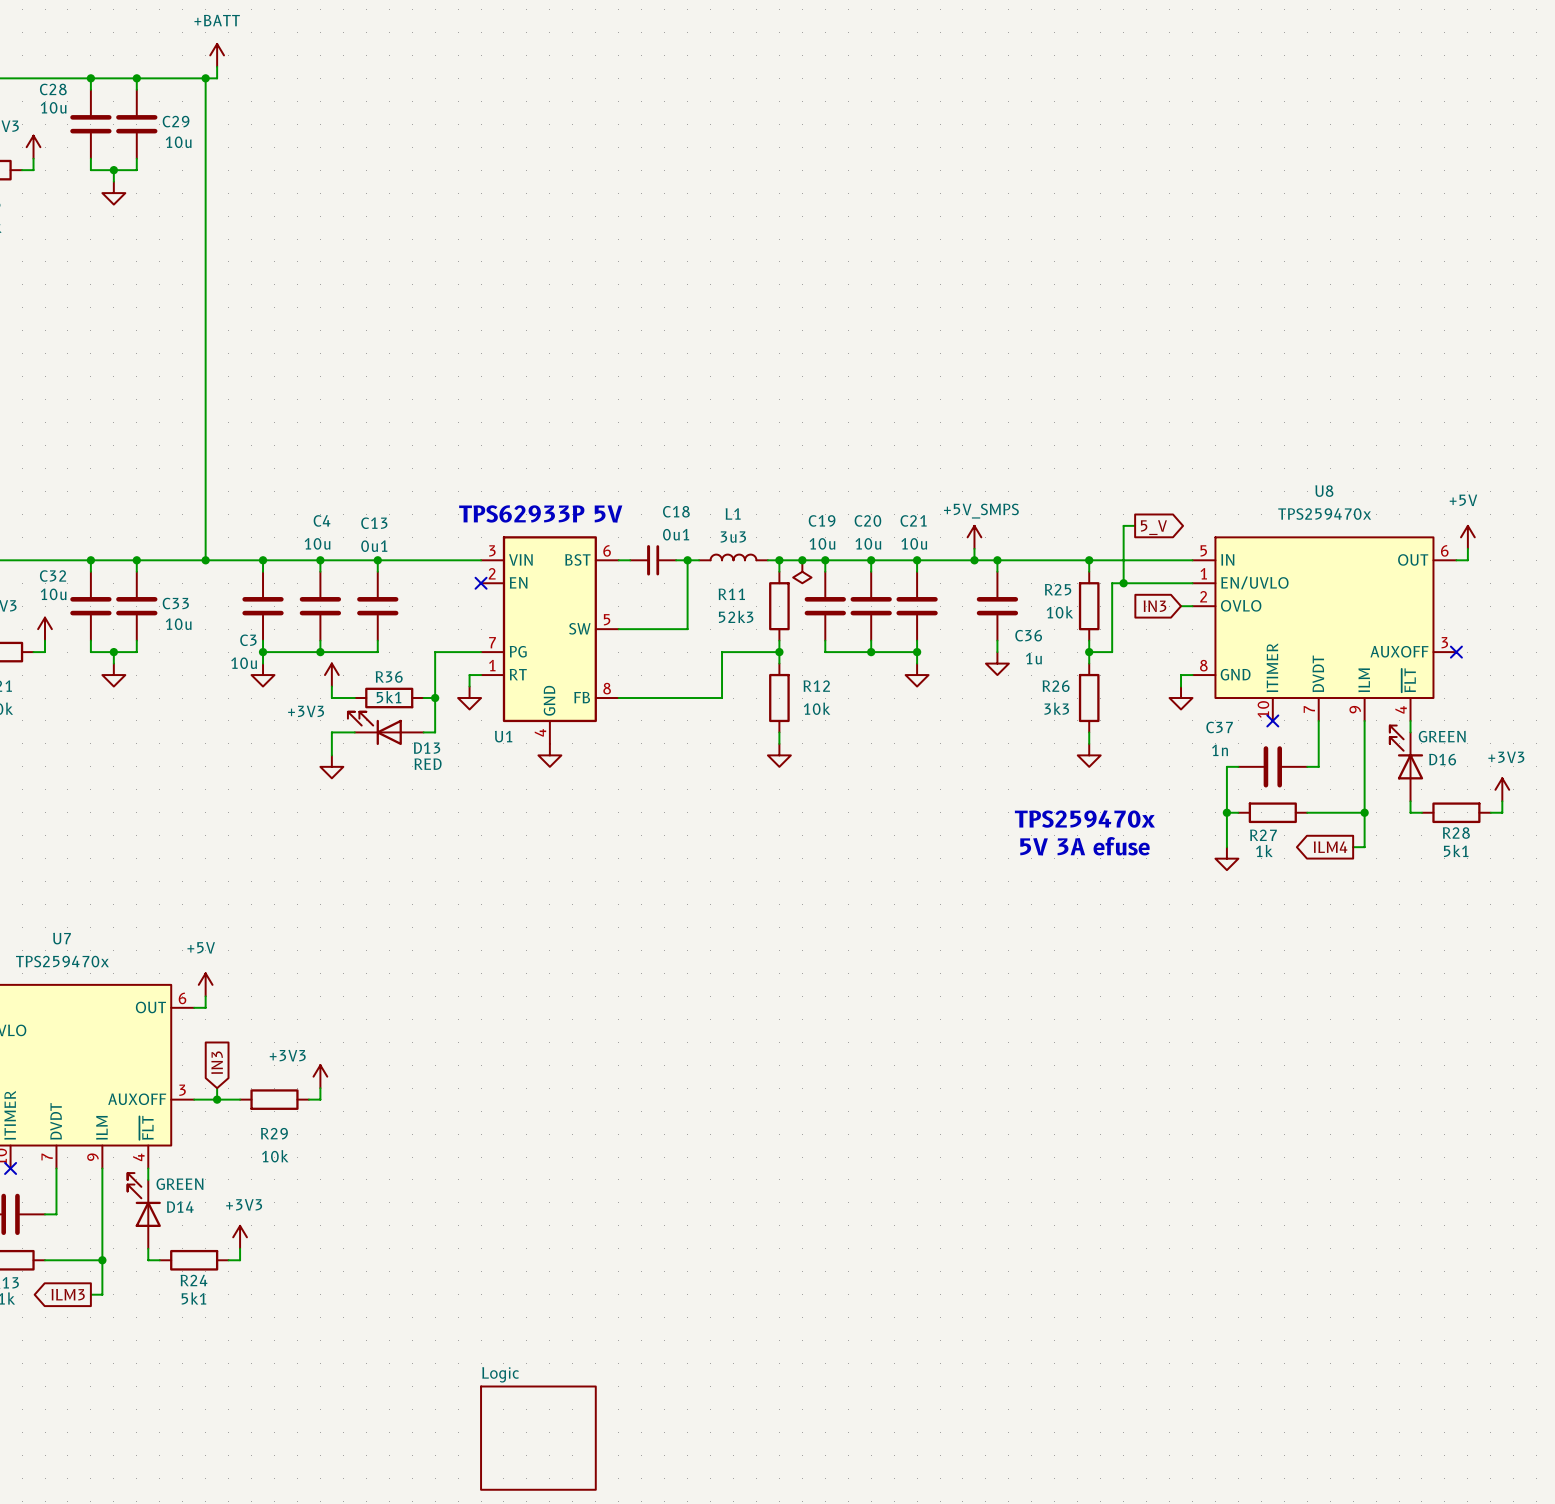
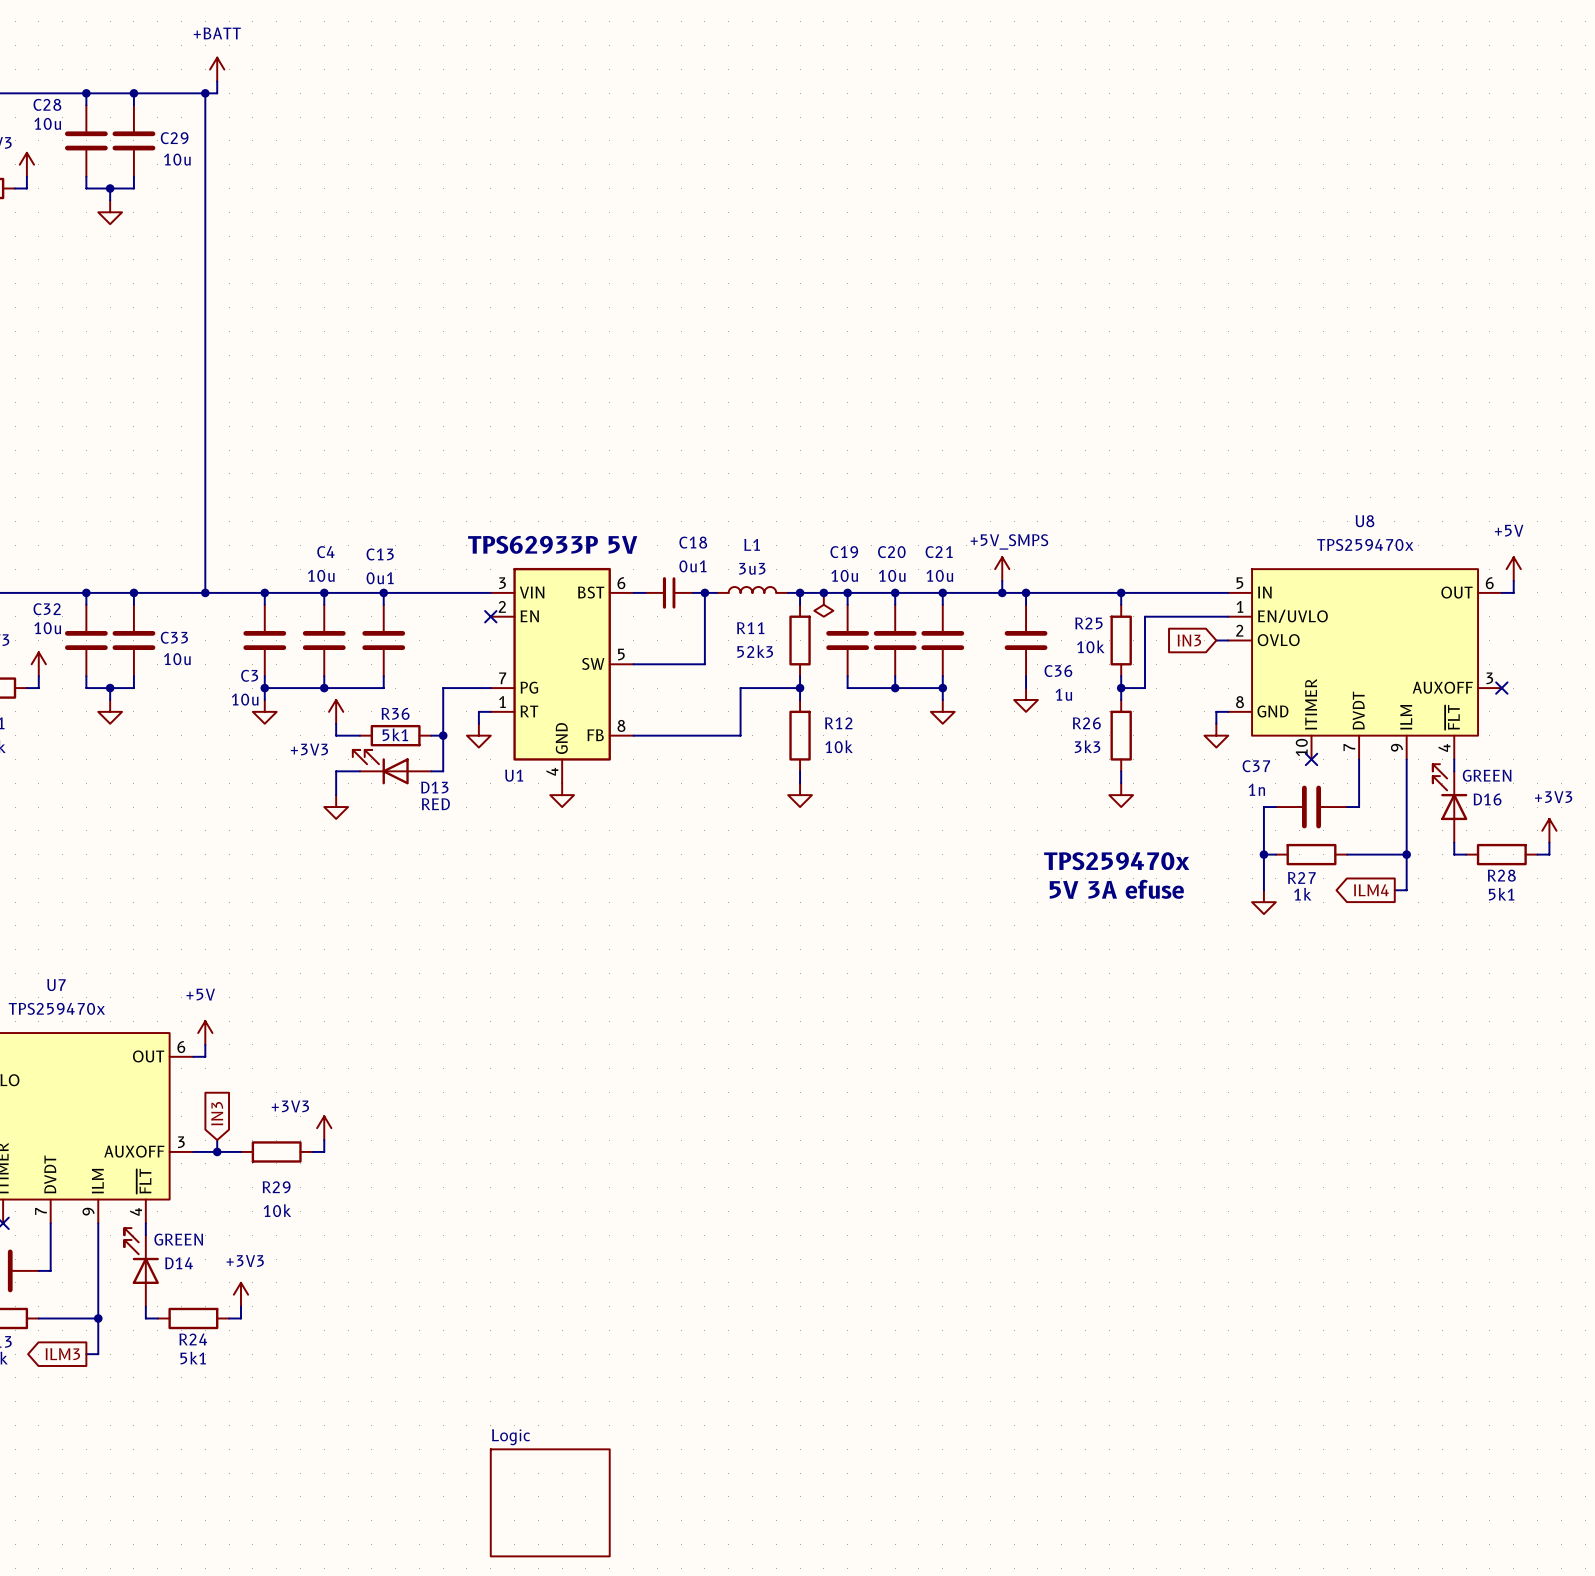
wire: (1135, 525) (1123, 525) (1123, 583) -> none
global label: 5_V (1153, 527) -> none
junction: (1123, 583) -> none

